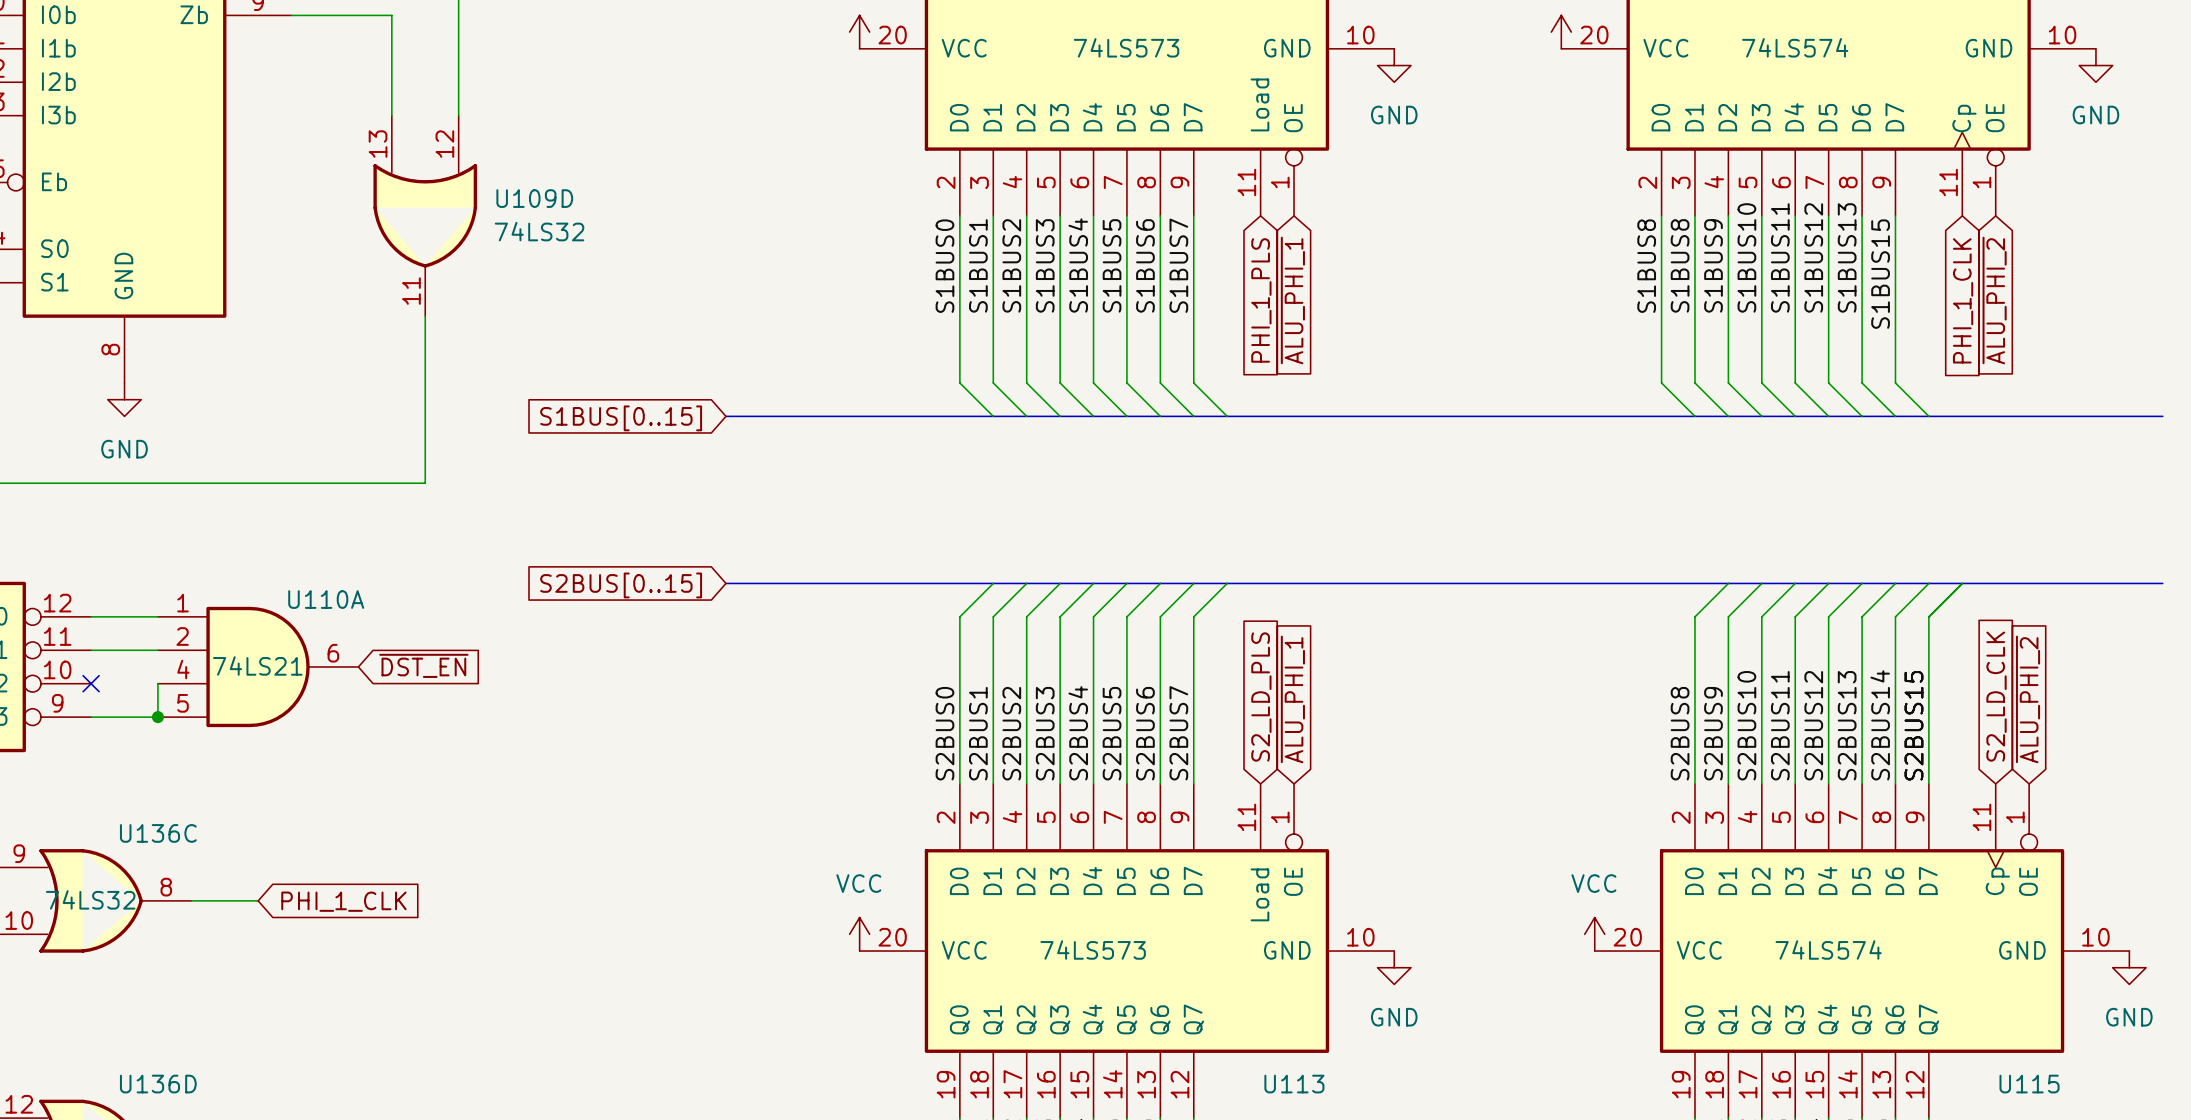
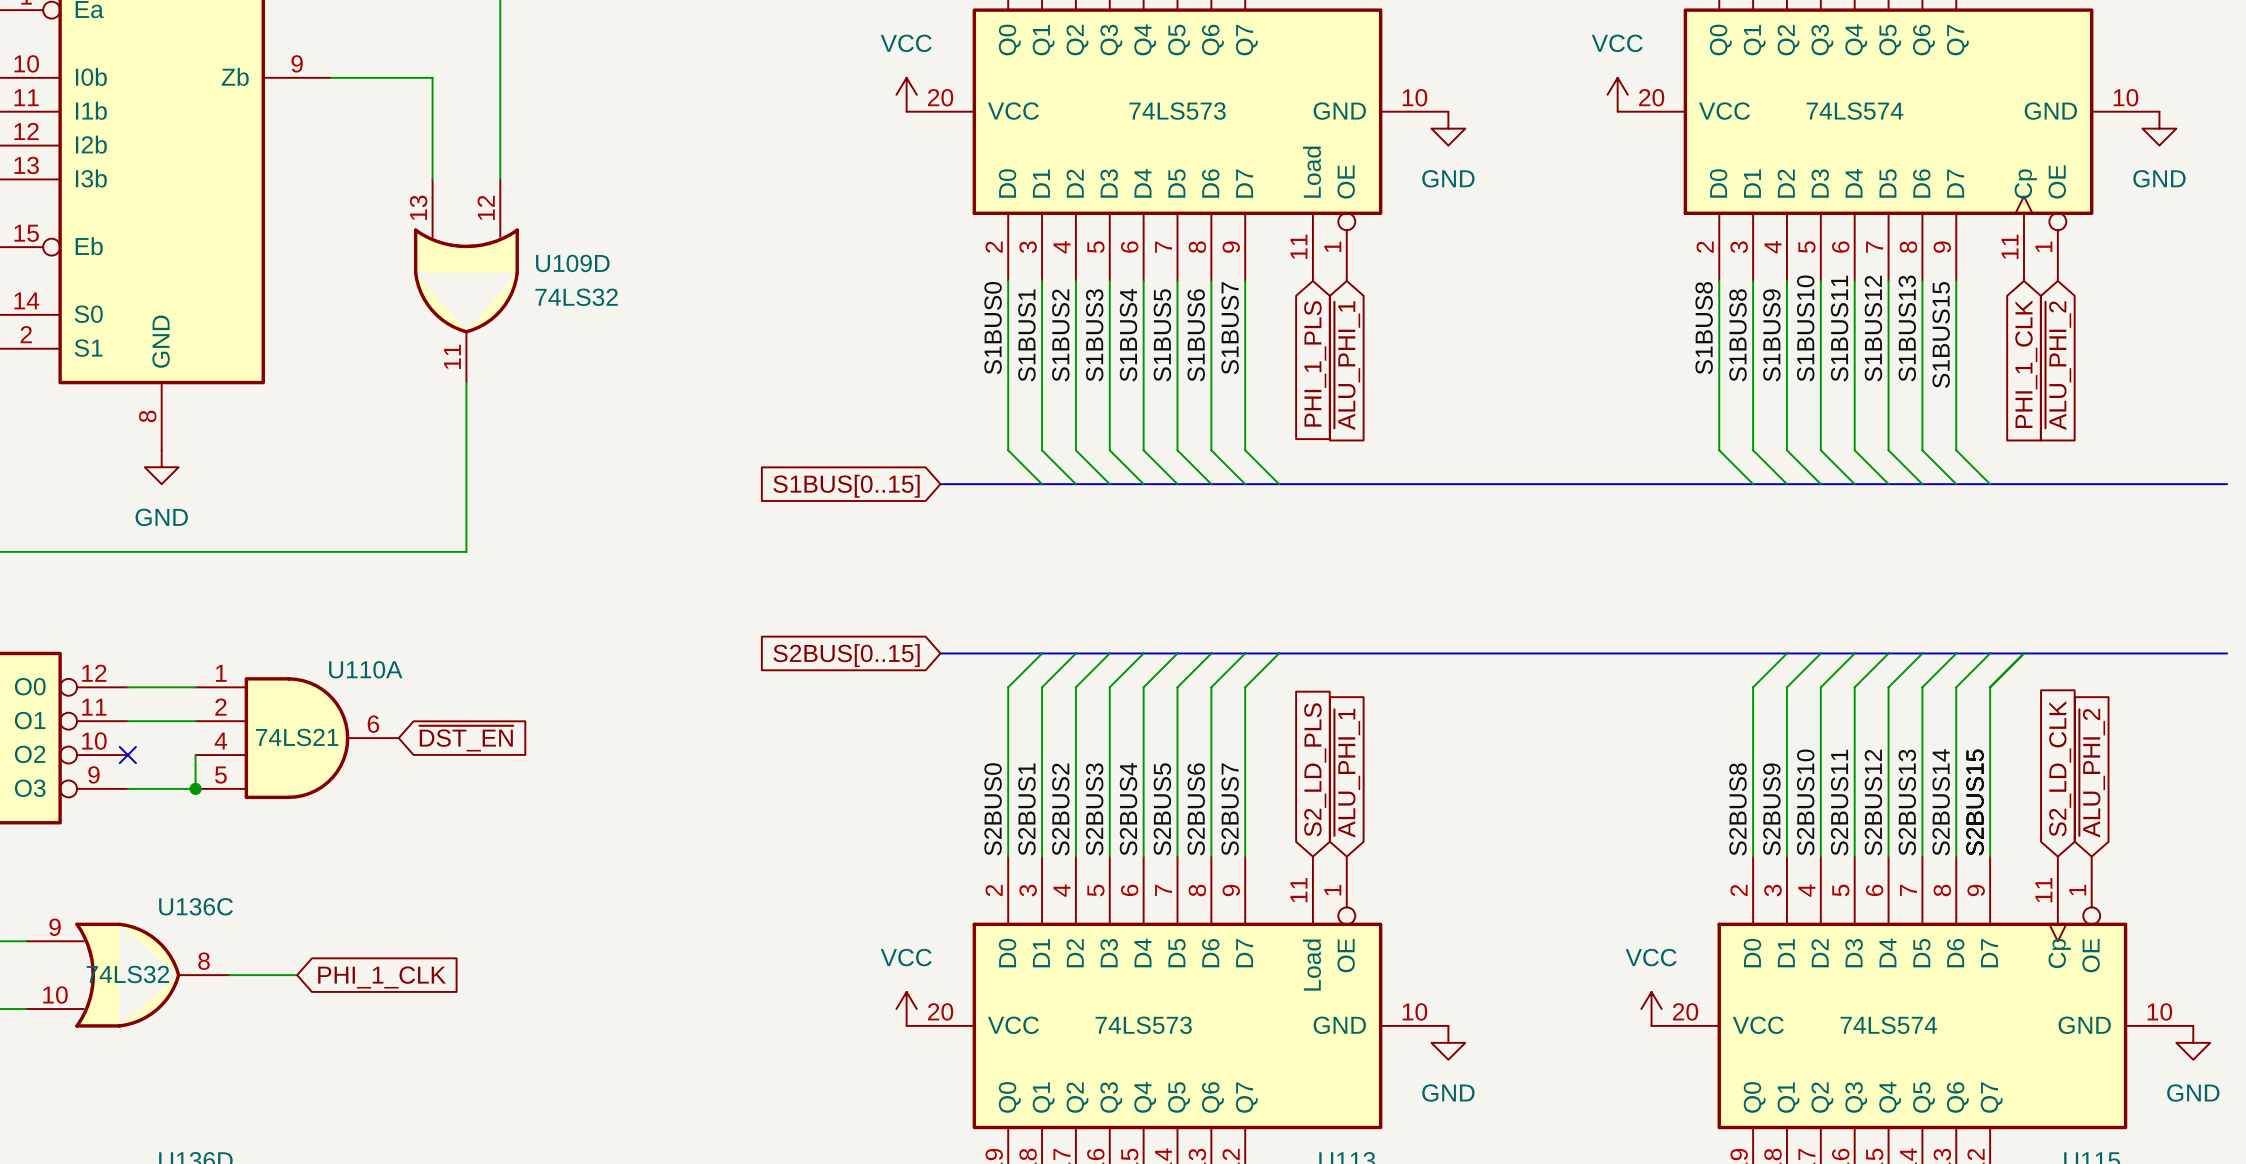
bus: (725, 416) (893, 416) -> none
global label position: S1BUS[0..15] (621, 418) -> S1BUS[0..15] (846, 486)
bus: (725, 583) (893, 583) -> none
global label position: S2BUS[0..15] (621, 585) -> S2BUS[0..15] (846, 655)

